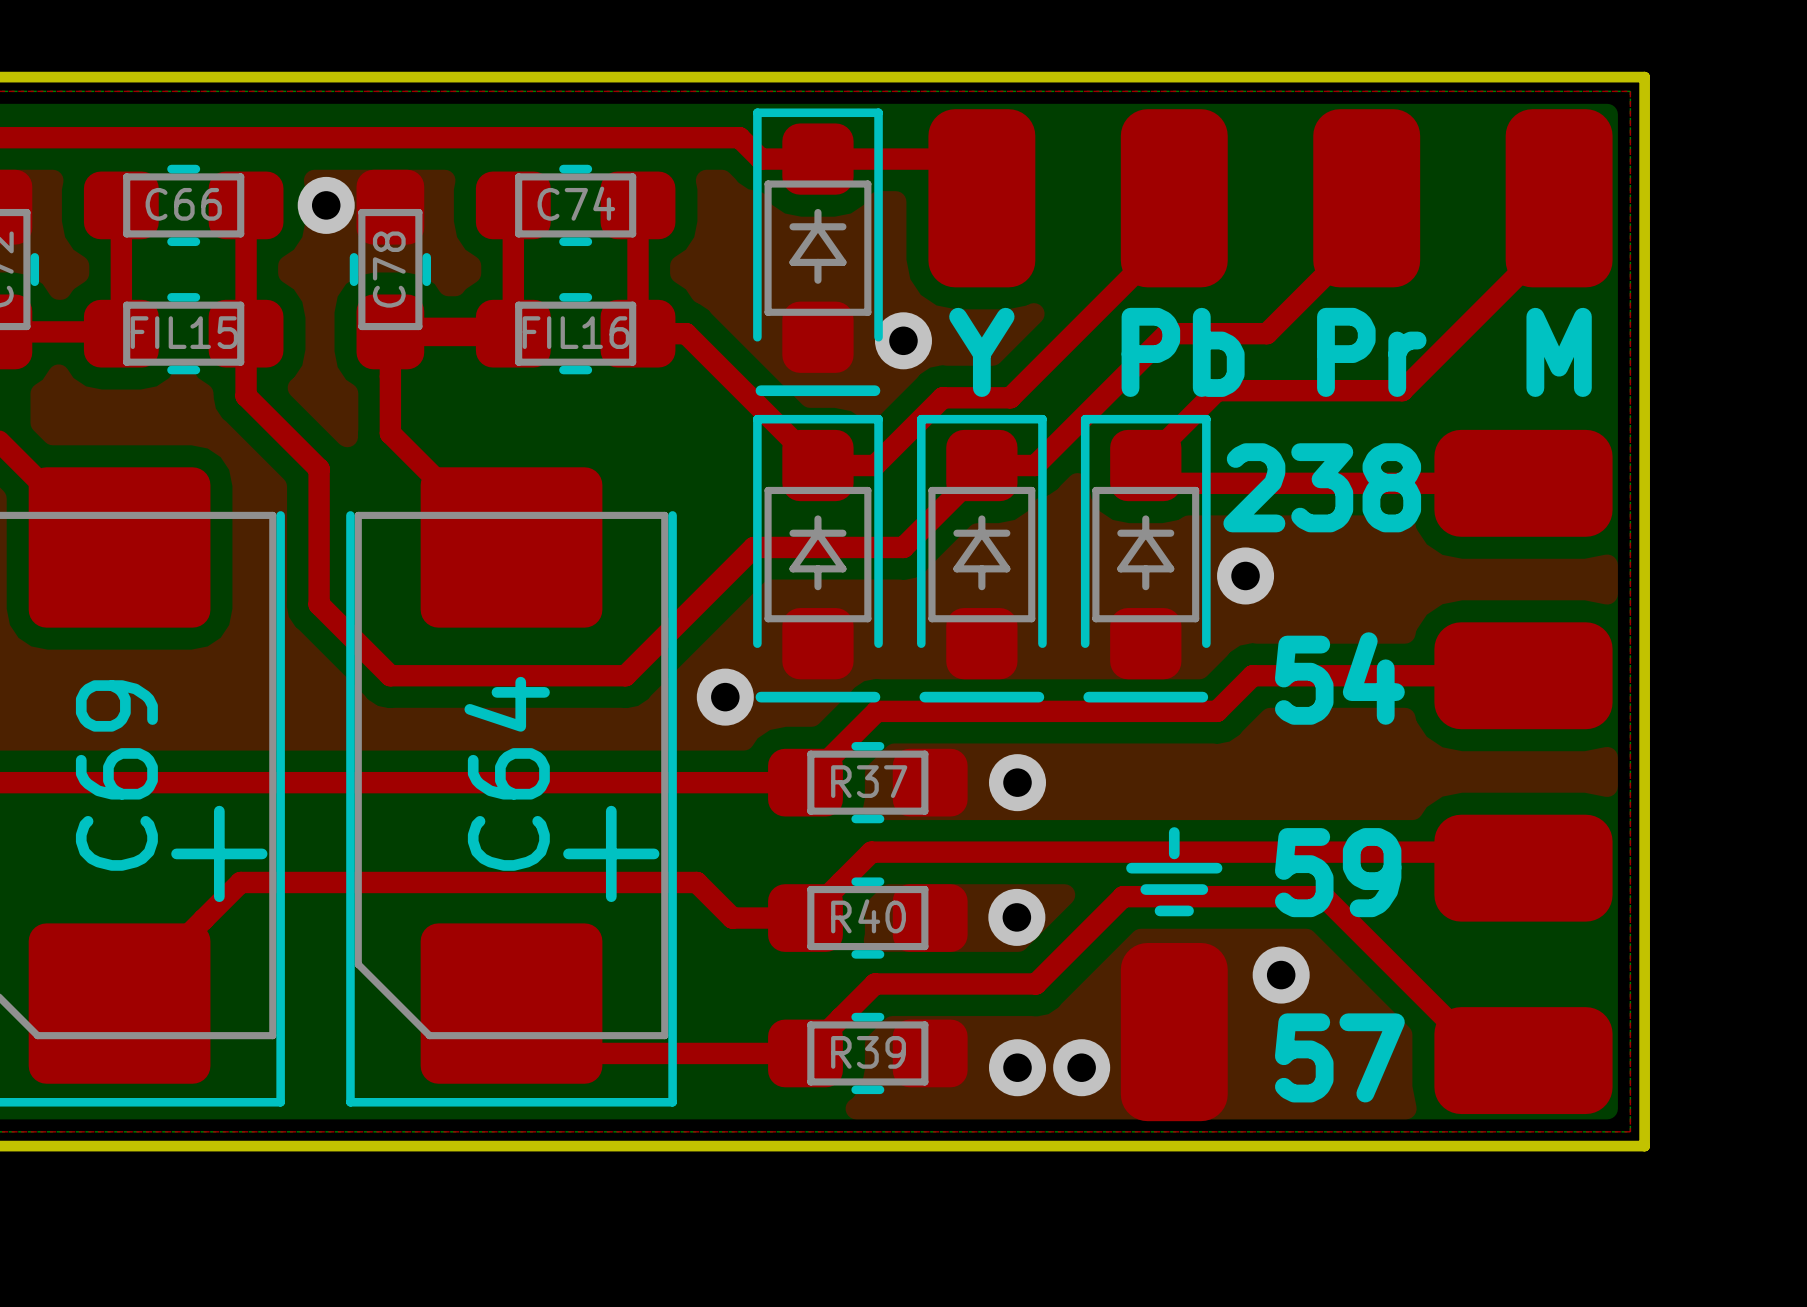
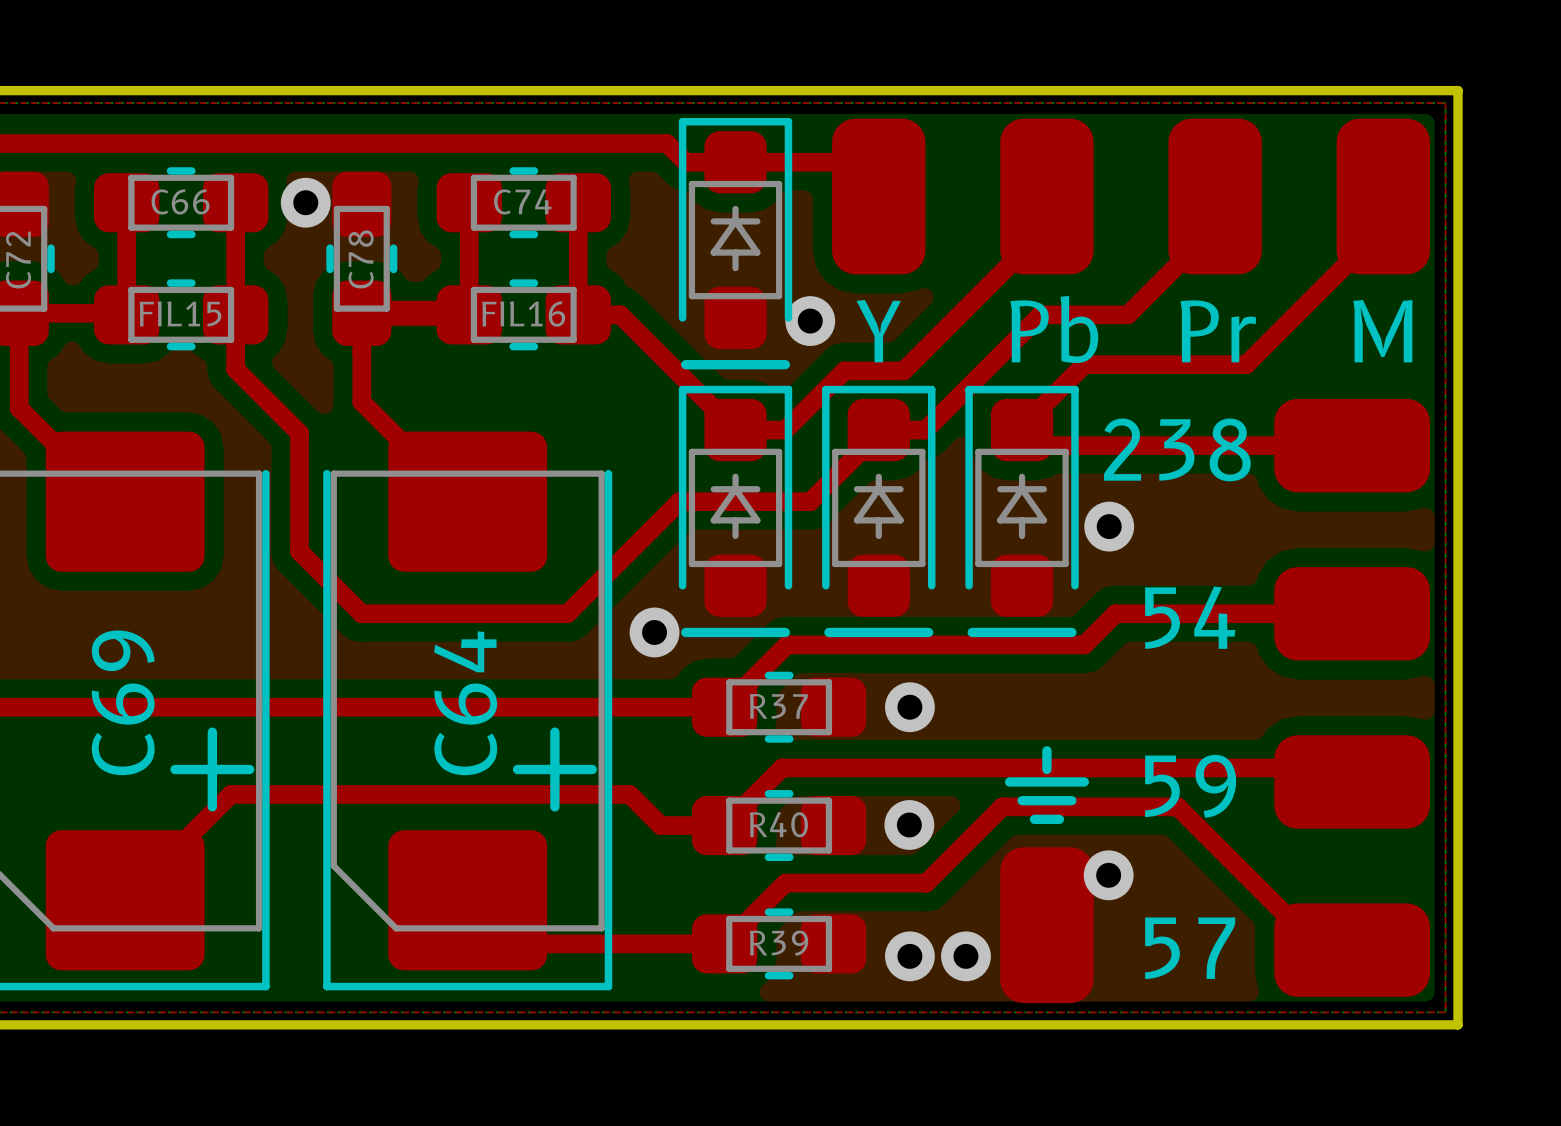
via position: (1281, 975) -> (1108, 875)

